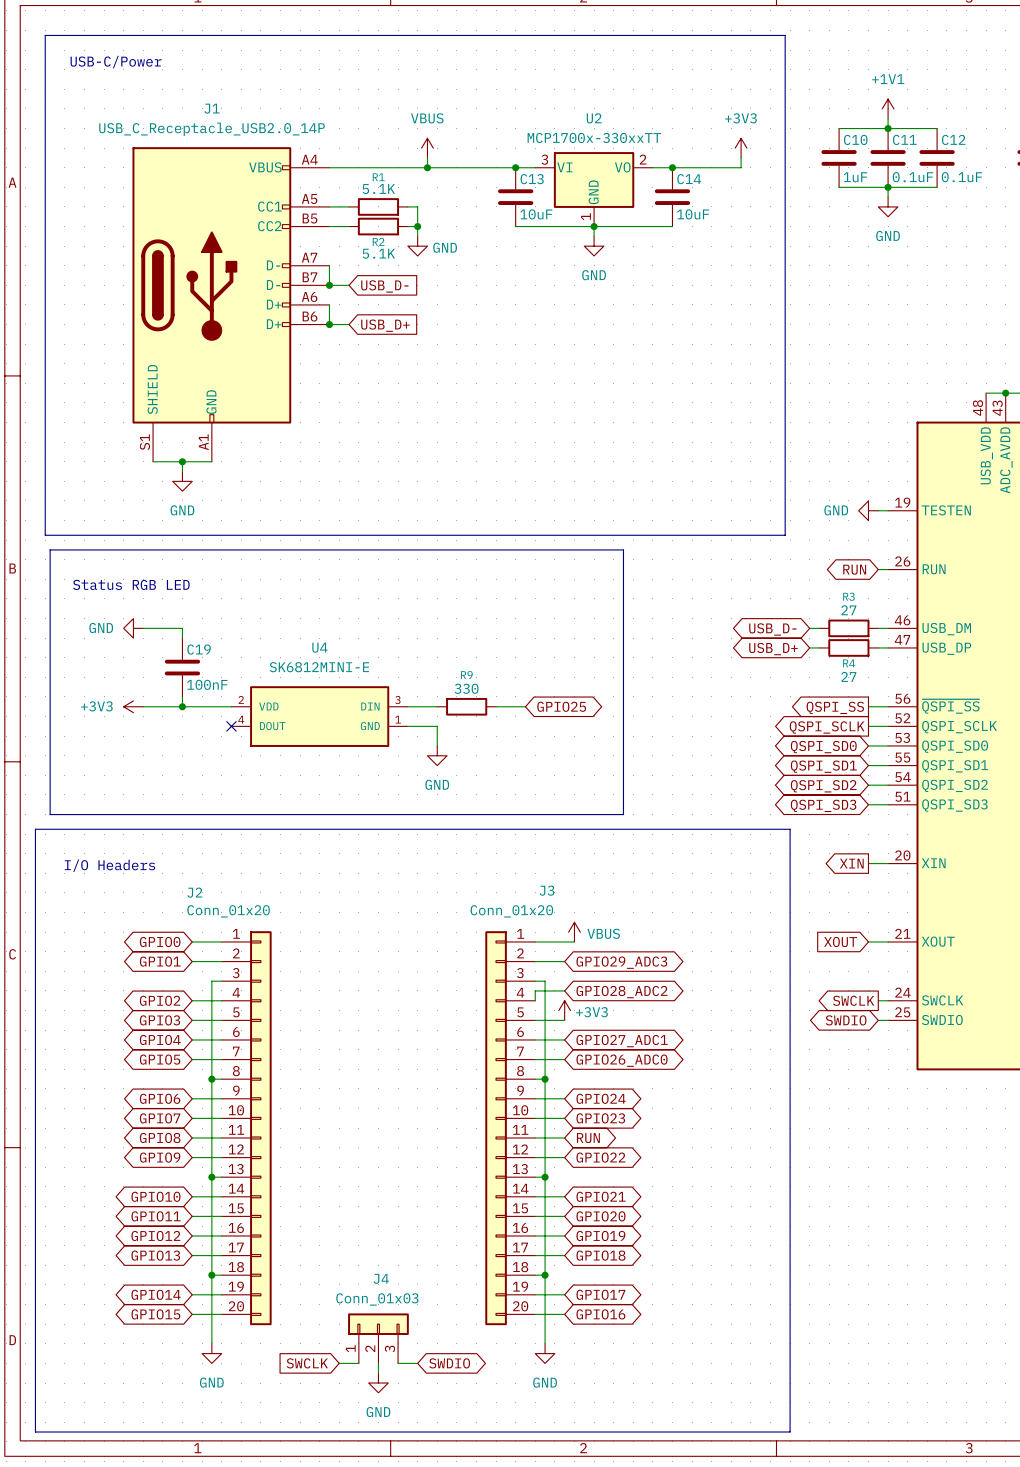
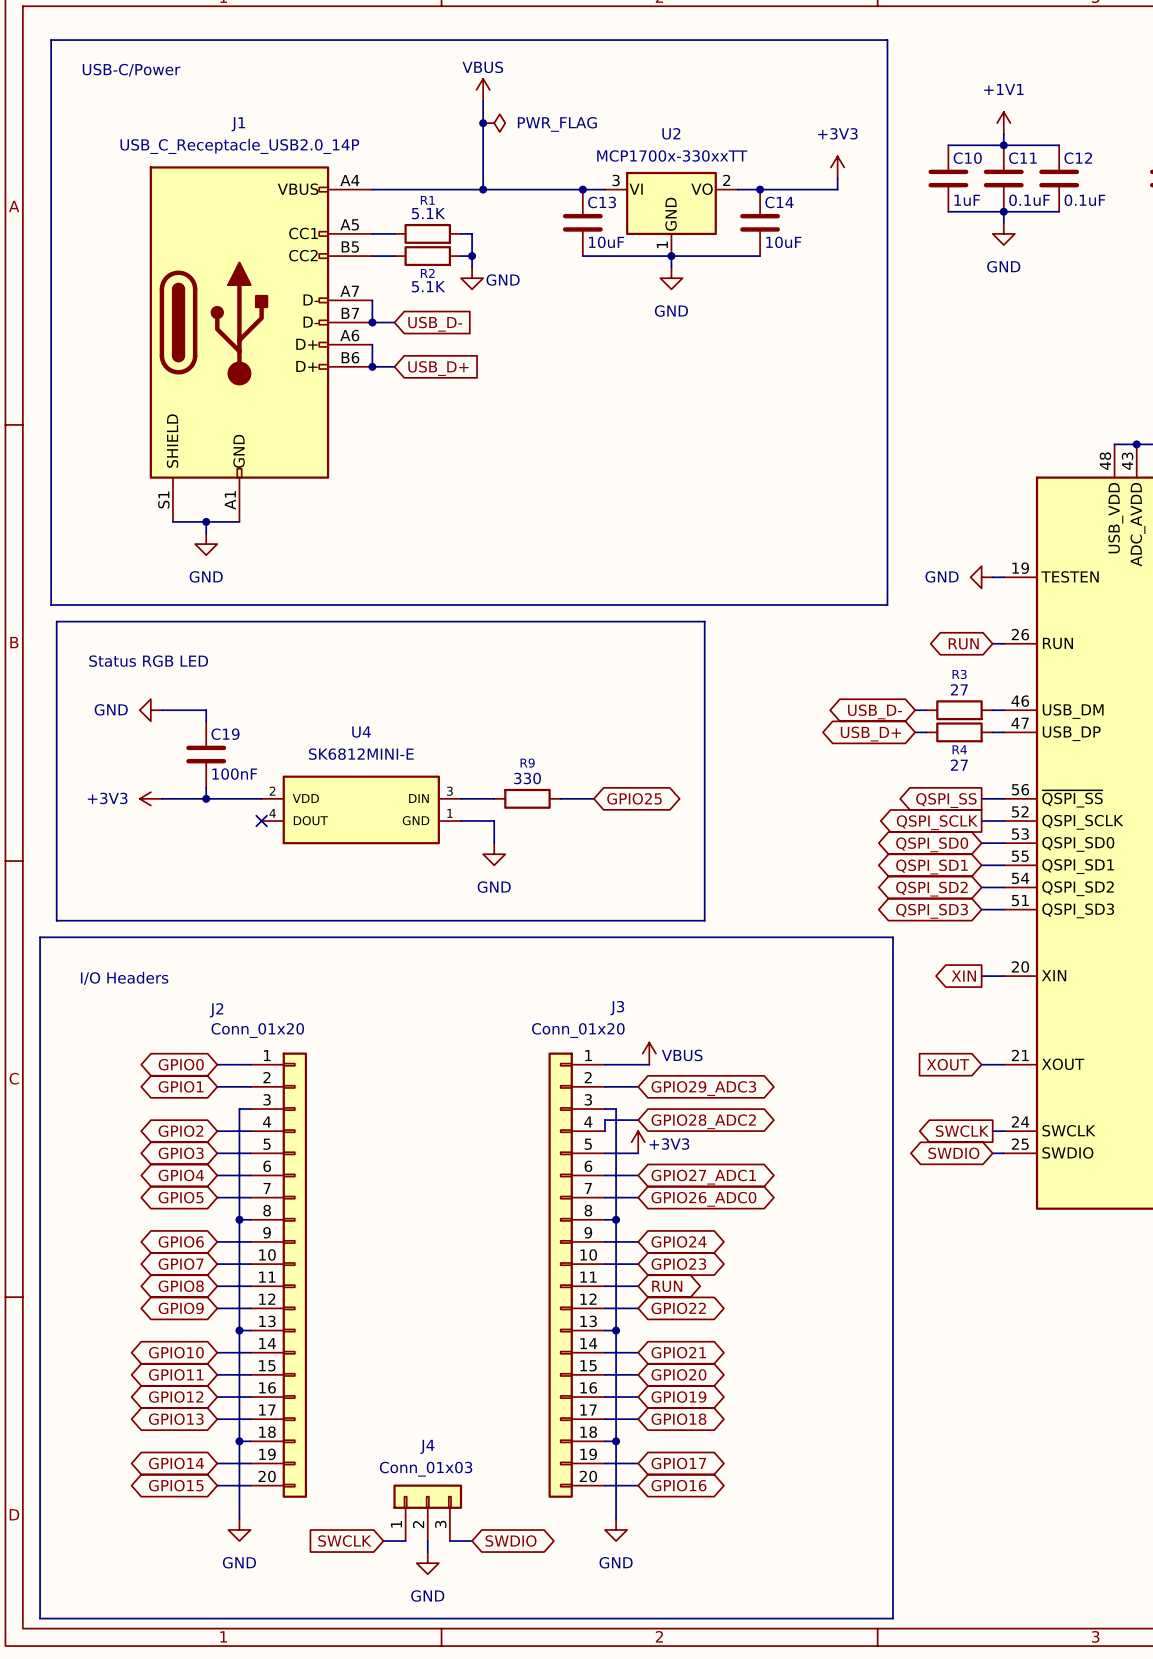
wire: none -> (483, 100) (483, 178)
junction: none -> (483, 123)
power symbol: none -> PWR_FLAG (494, 123)
power symbol text position: VBUS (427, 118) -> VBUS (482, 67)
power symbol position: VBUS (427, 148) -> VBUS (483, 89)

